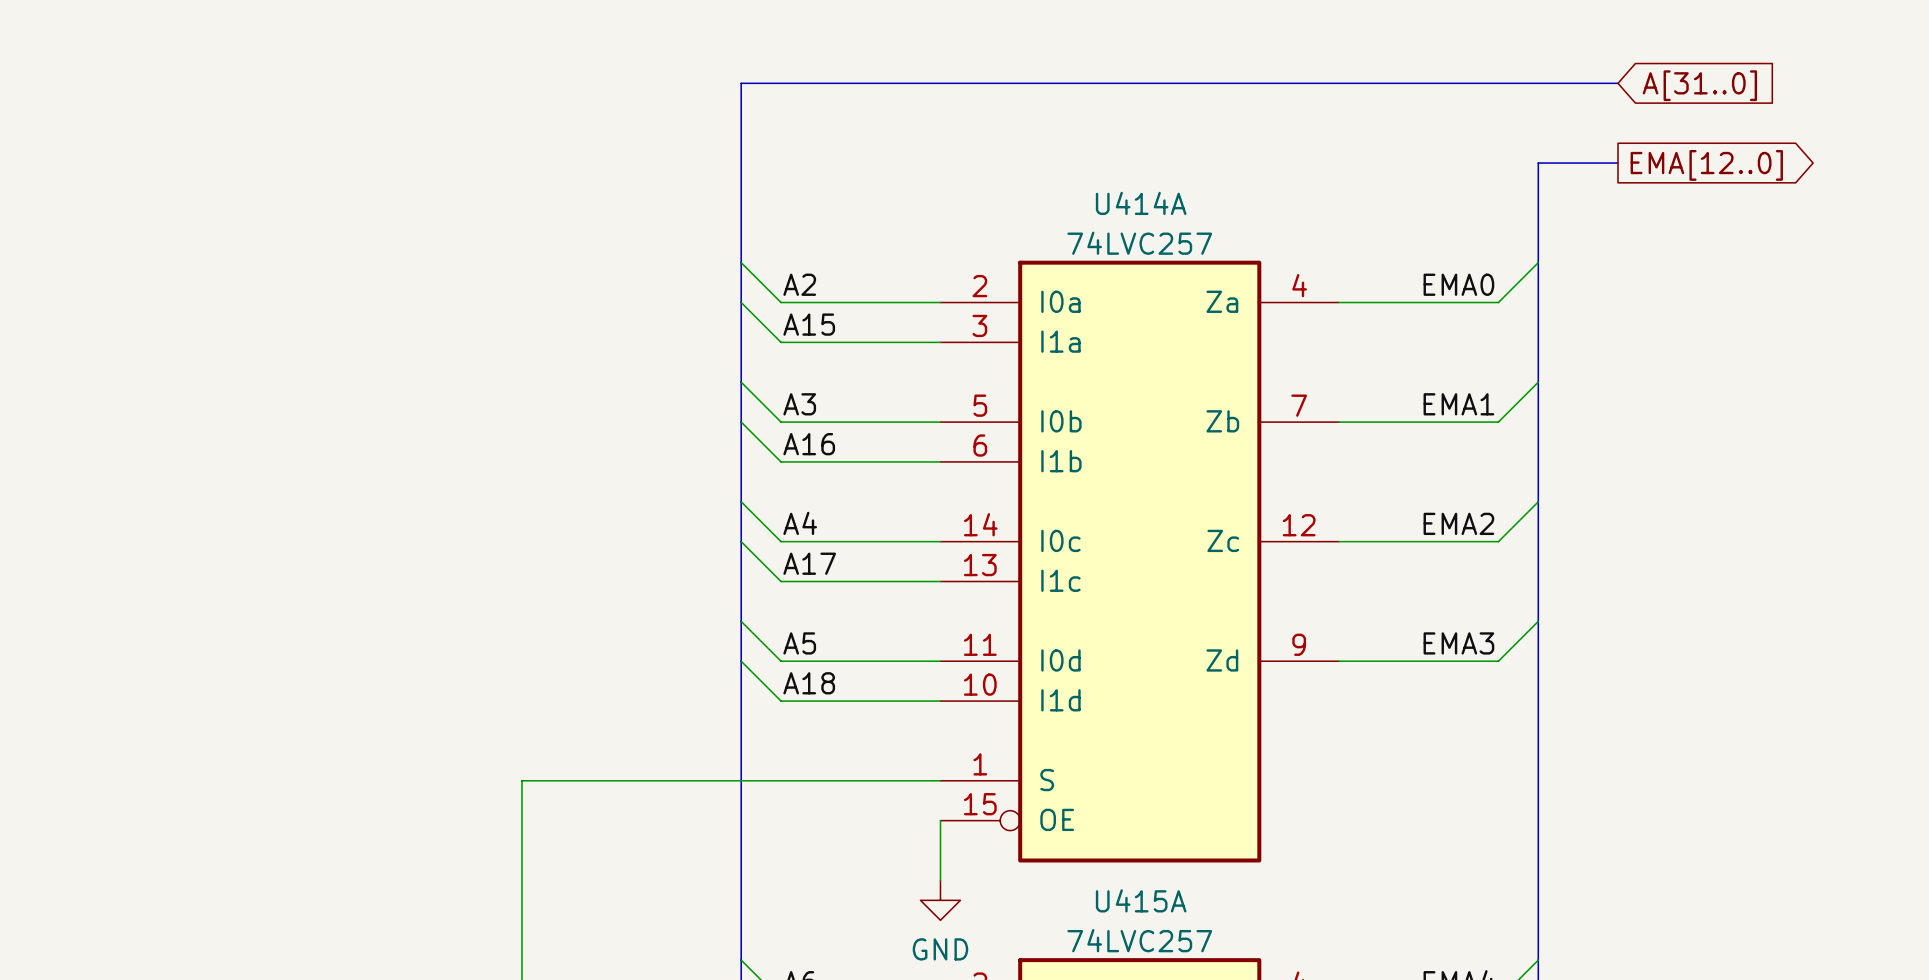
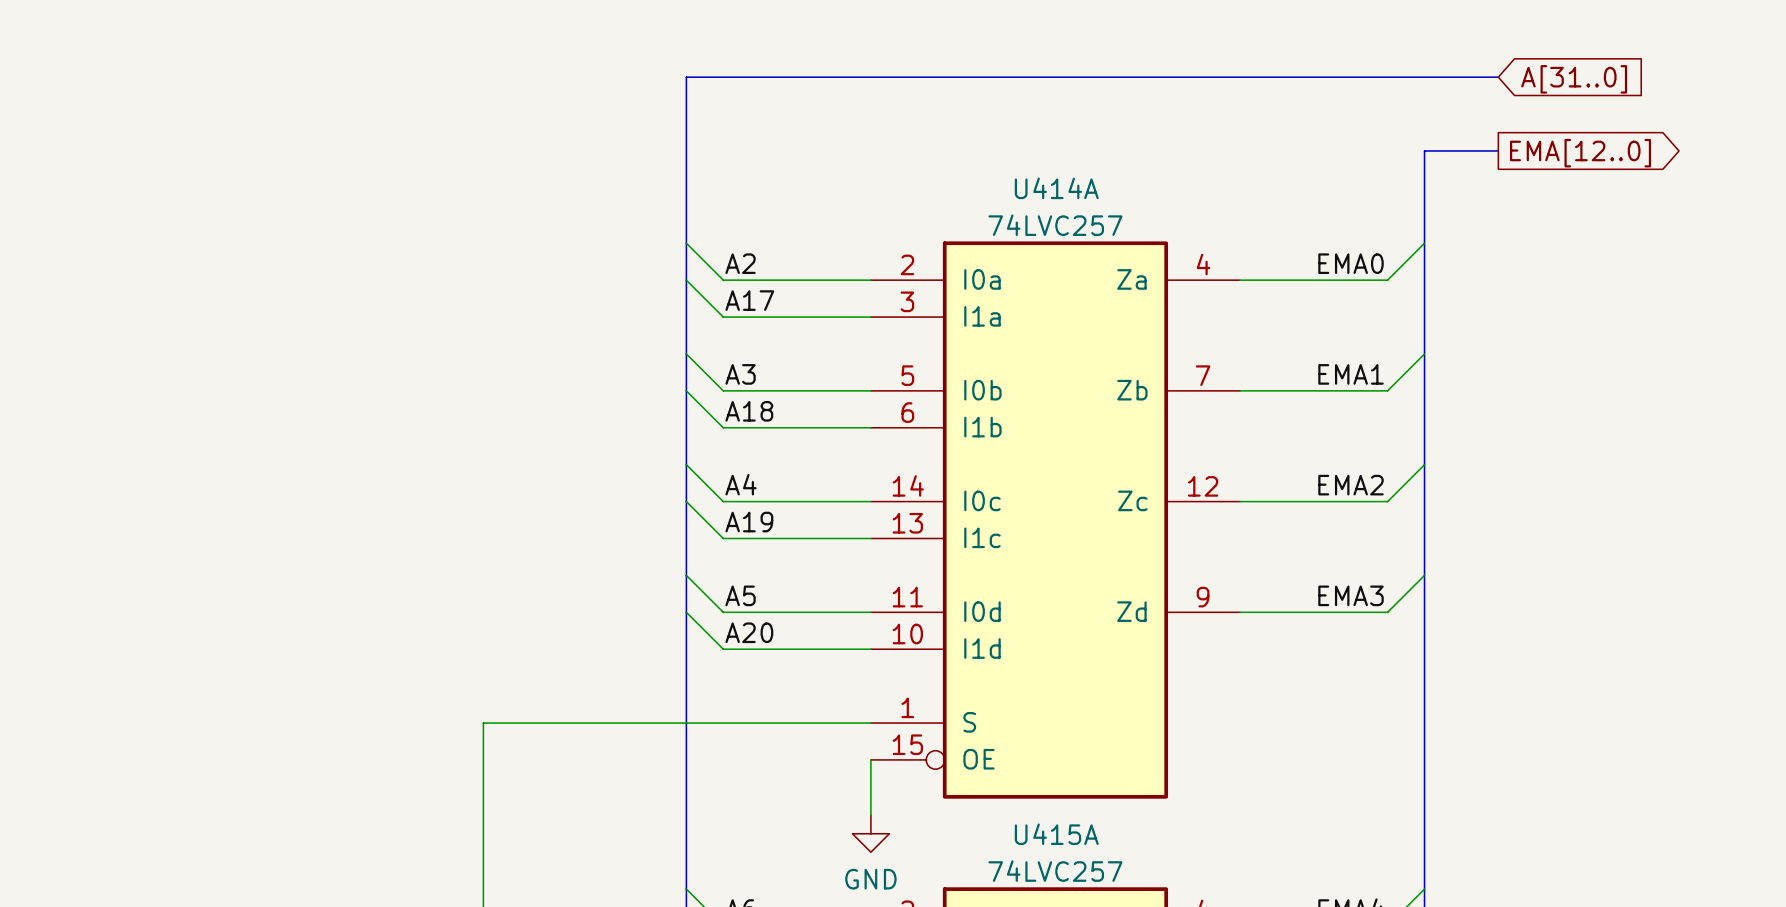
label: A15 (809, 324) -> A17 (749, 300)
label: A16 (809, 444) -> A18 (749, 411)
label: A17 (809, 563) -> A19 (749, 522)
label: A18 (809, 683) -> A20 (749, 632)

